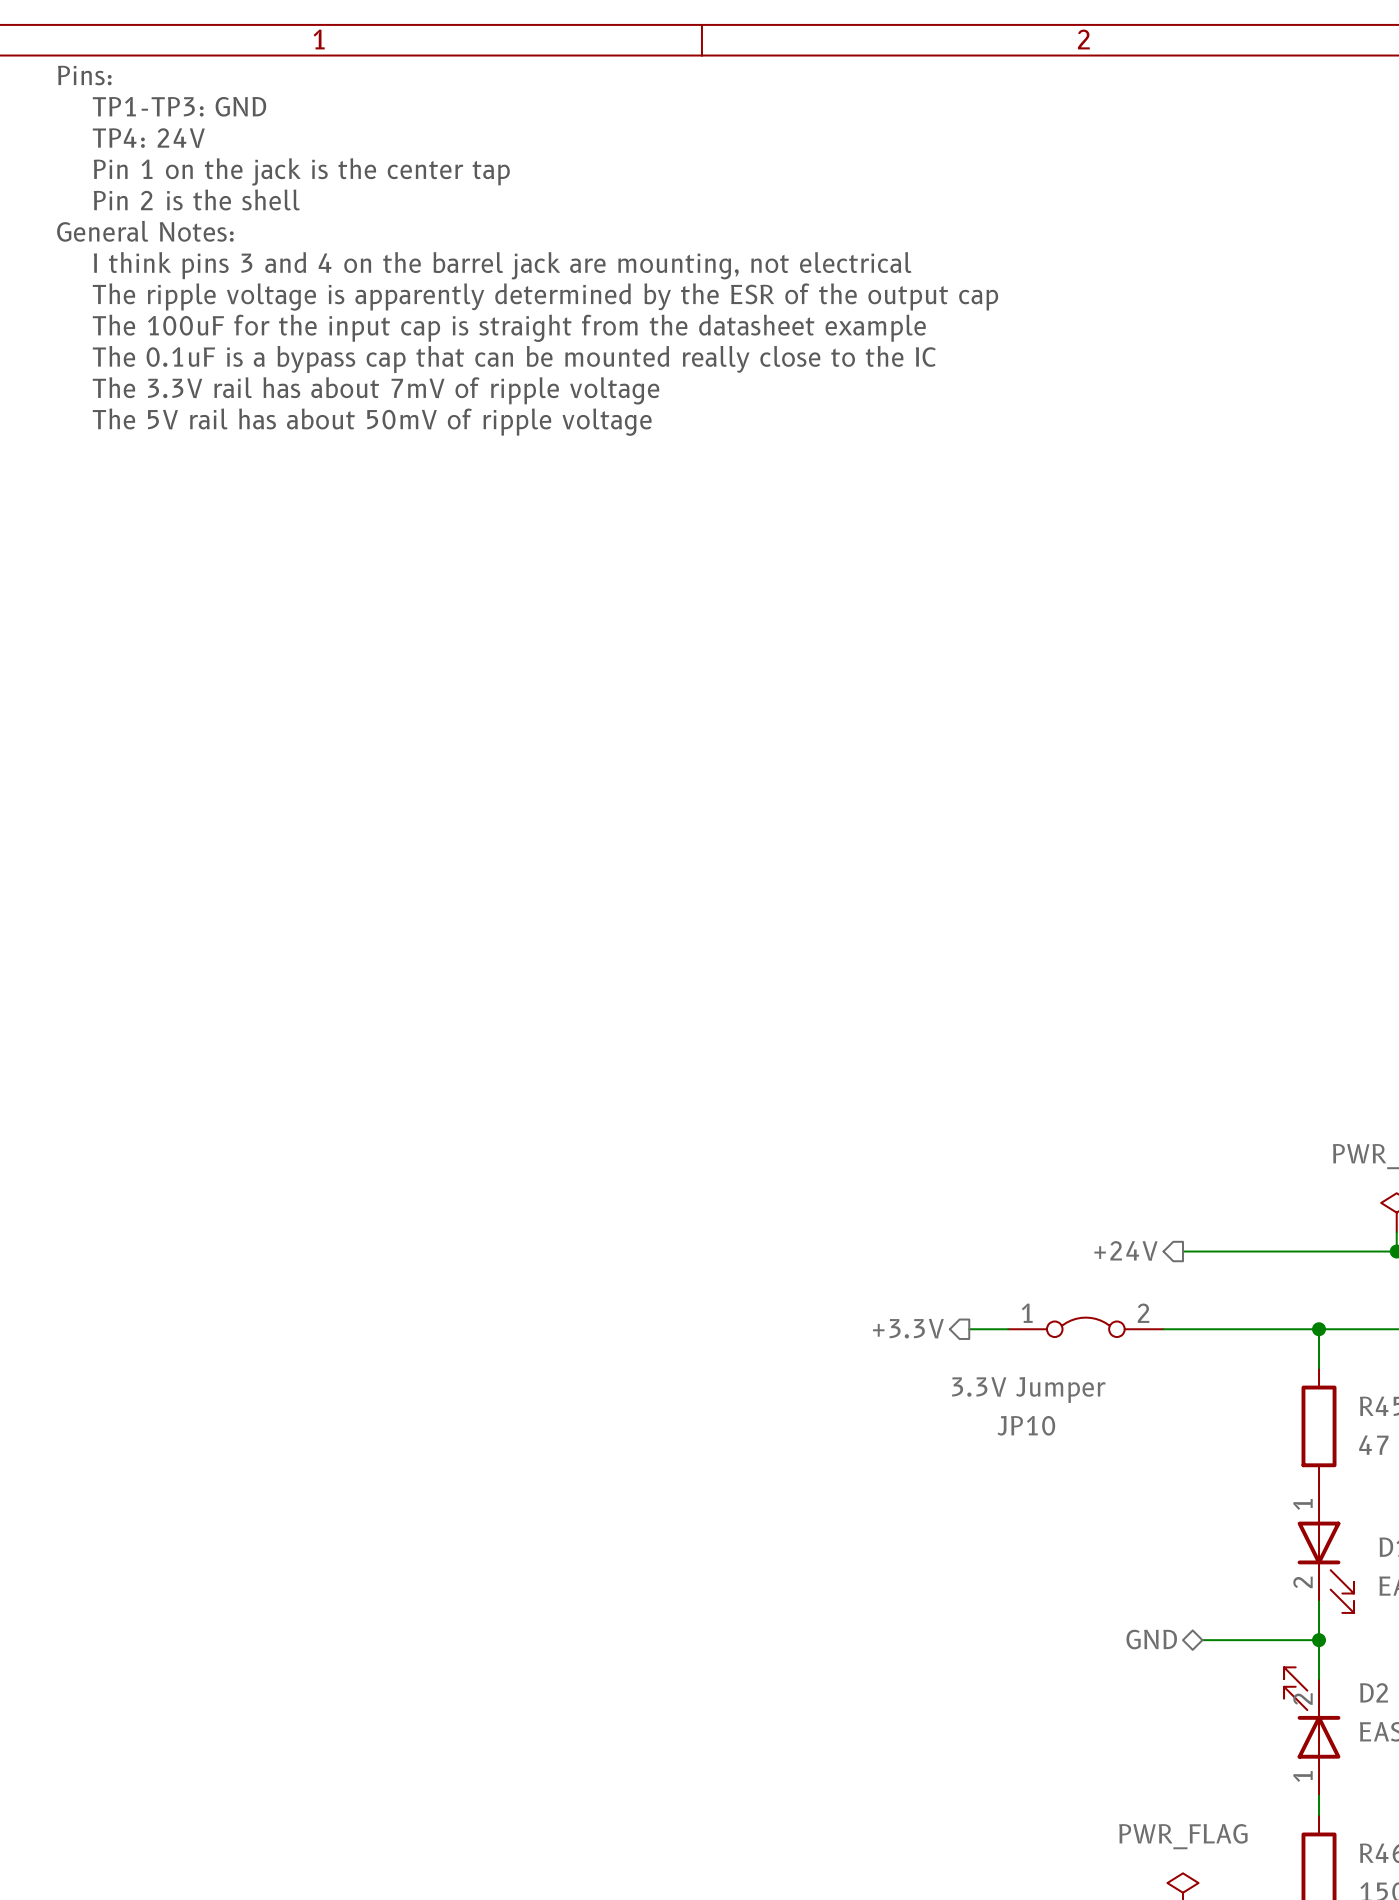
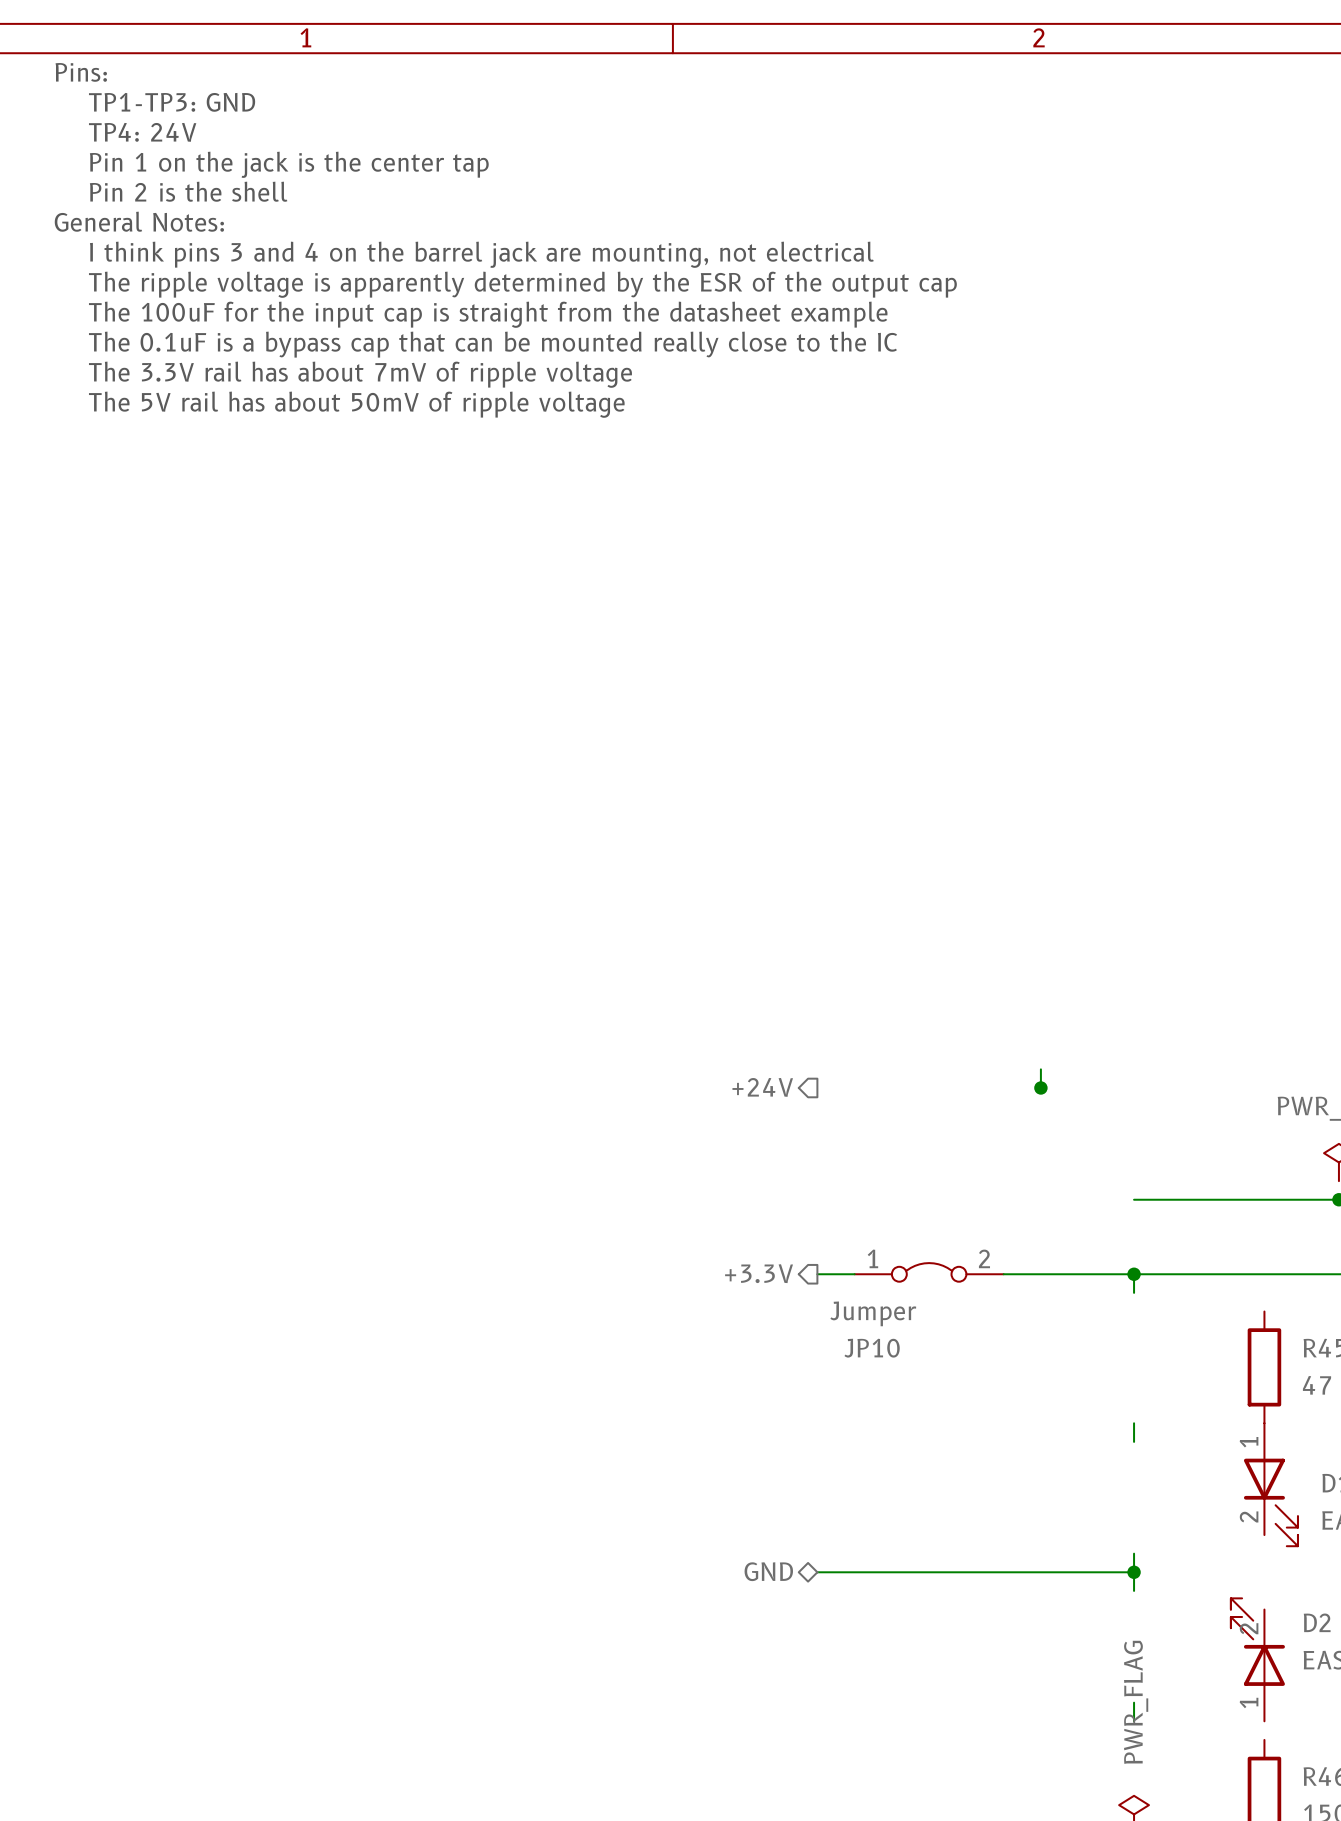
wire: none -> (1040, 1069) (1040, 1087)
junction: none -> (1040, 1087)
wire: (1396, 1232) (1396, 1251) -> (1134, 1274) (1134, 1292)
hierarchical label position: +24V (1125, 1250) -> +24V (762, 1087)
JP10 position: (1085, 1327) -> (929, 1272)
hierarchical label position: +3.3V (908, 1328) -> +3.3V (759, 1273)
wire: (969, 1329) (1008, 1329) -> (817, 1274) (854, 1274)
junction: none -> (1134, 1274)
wire: (1319, 1329) (1319, 1368) -> (1134, 1553) (1134, 1590)
junction: (1319, 1329) -> none
JP10 value: 3.3V Jumper (1028, 1390) -> Jumper (873, 1313)
JP10 name position: JP10 (1026, 1425) -> JP10 (872, 1348)
wire: none -> (1134, 1423) (1134, 1441)
wire: (1319, 1601) (1319, 1679) -> none
hierarchical label position: GND (1151, 1639) -> GND (768, 1571)
wire: none -> (817, 1572) (1134, 1572)
junction: none -> (1134, 1572)
wire: (1202, 1640) (1319, 1640) -> (1003, 1274) (1115, 1274)
junction: (1319, 1640) -> none
wire: (1319, 1795) (1319, 1815) -> (1134, 1702) (1134, 1721)
power symbol text rotation: 0° (1183, 1836) -> 90° counterclockwise (1136, 1702)

